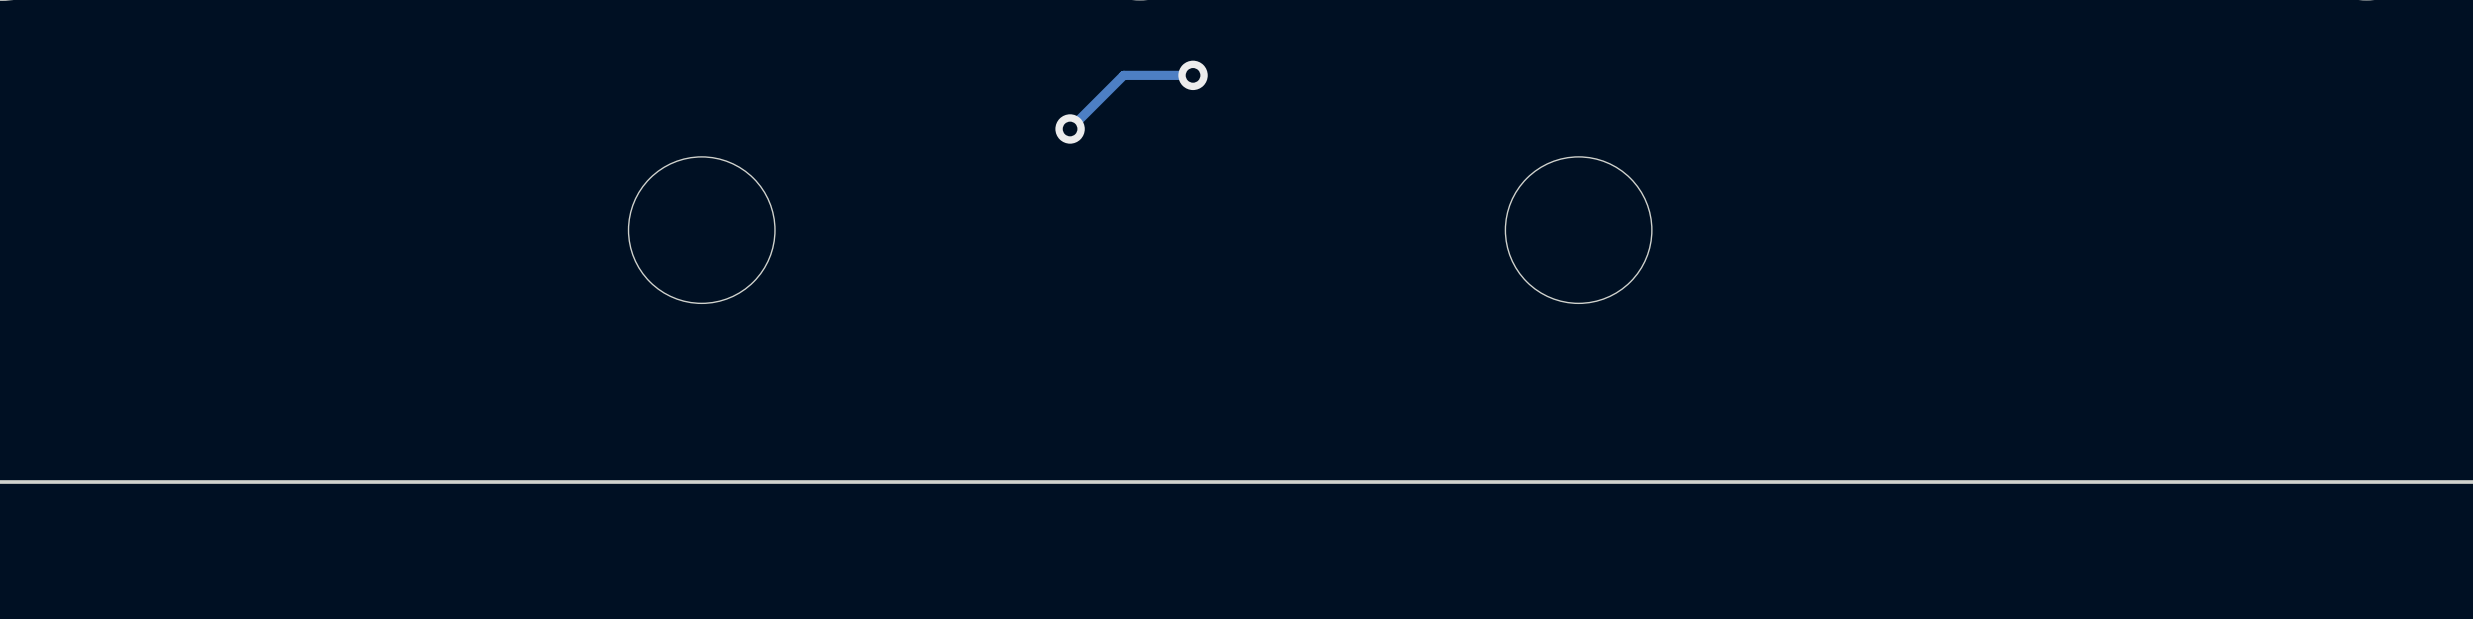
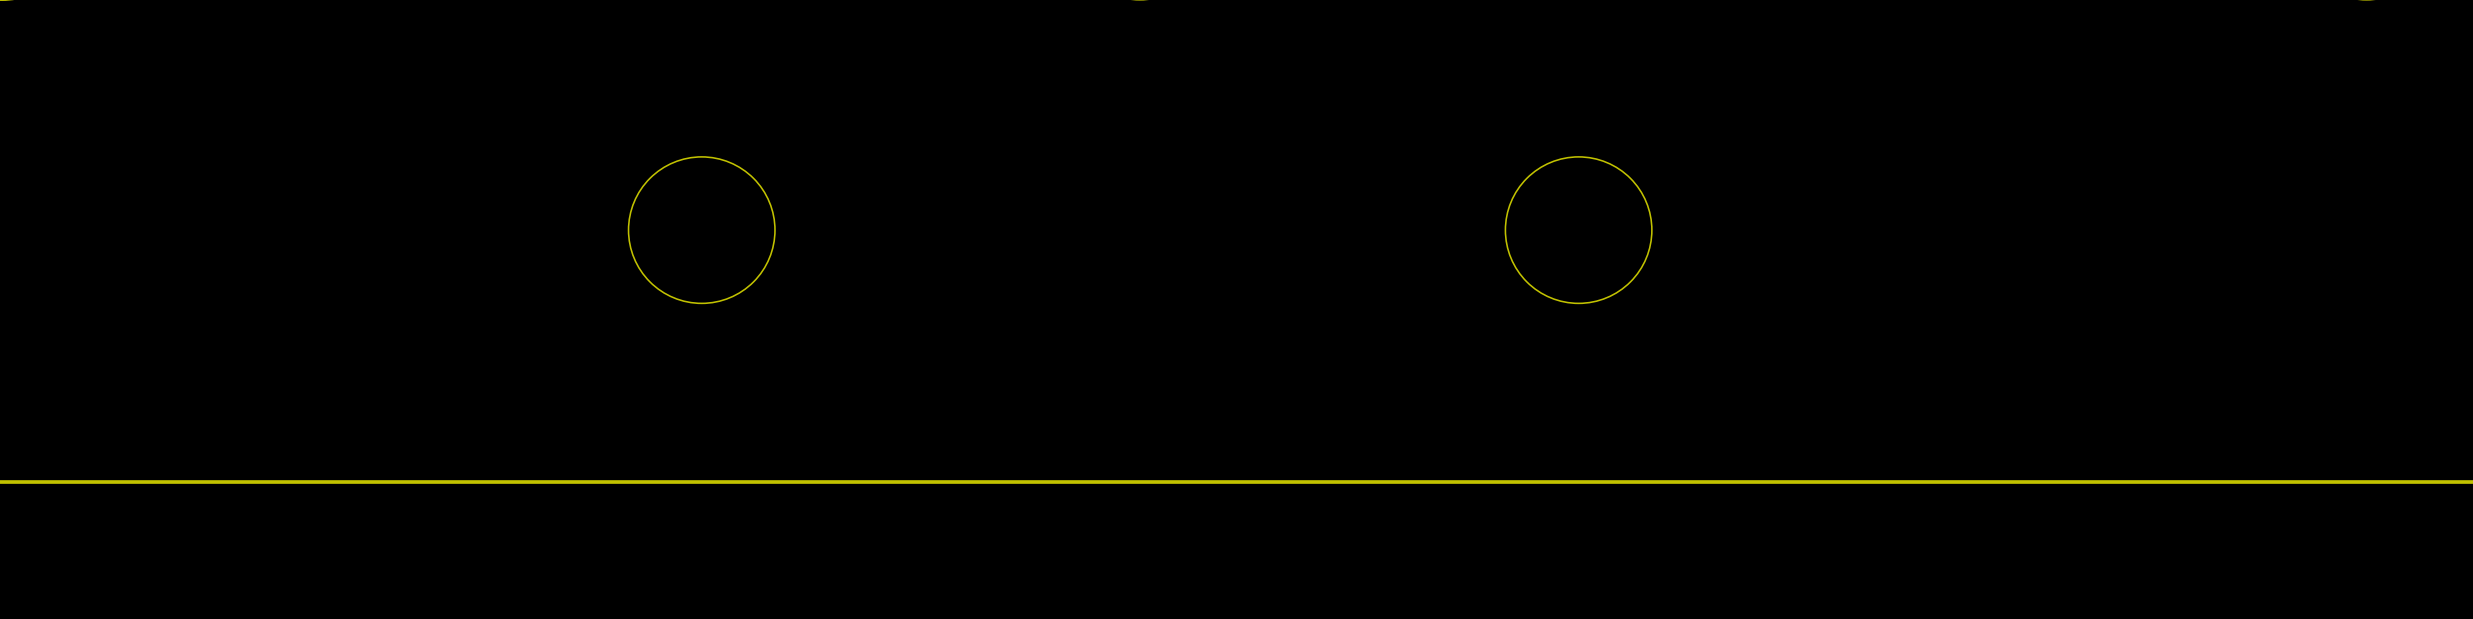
track: (1193, 75) (1123, 75) (1070, 128) -> none
via: (1193, 75) -> none
via: (1070, 128) -> none

